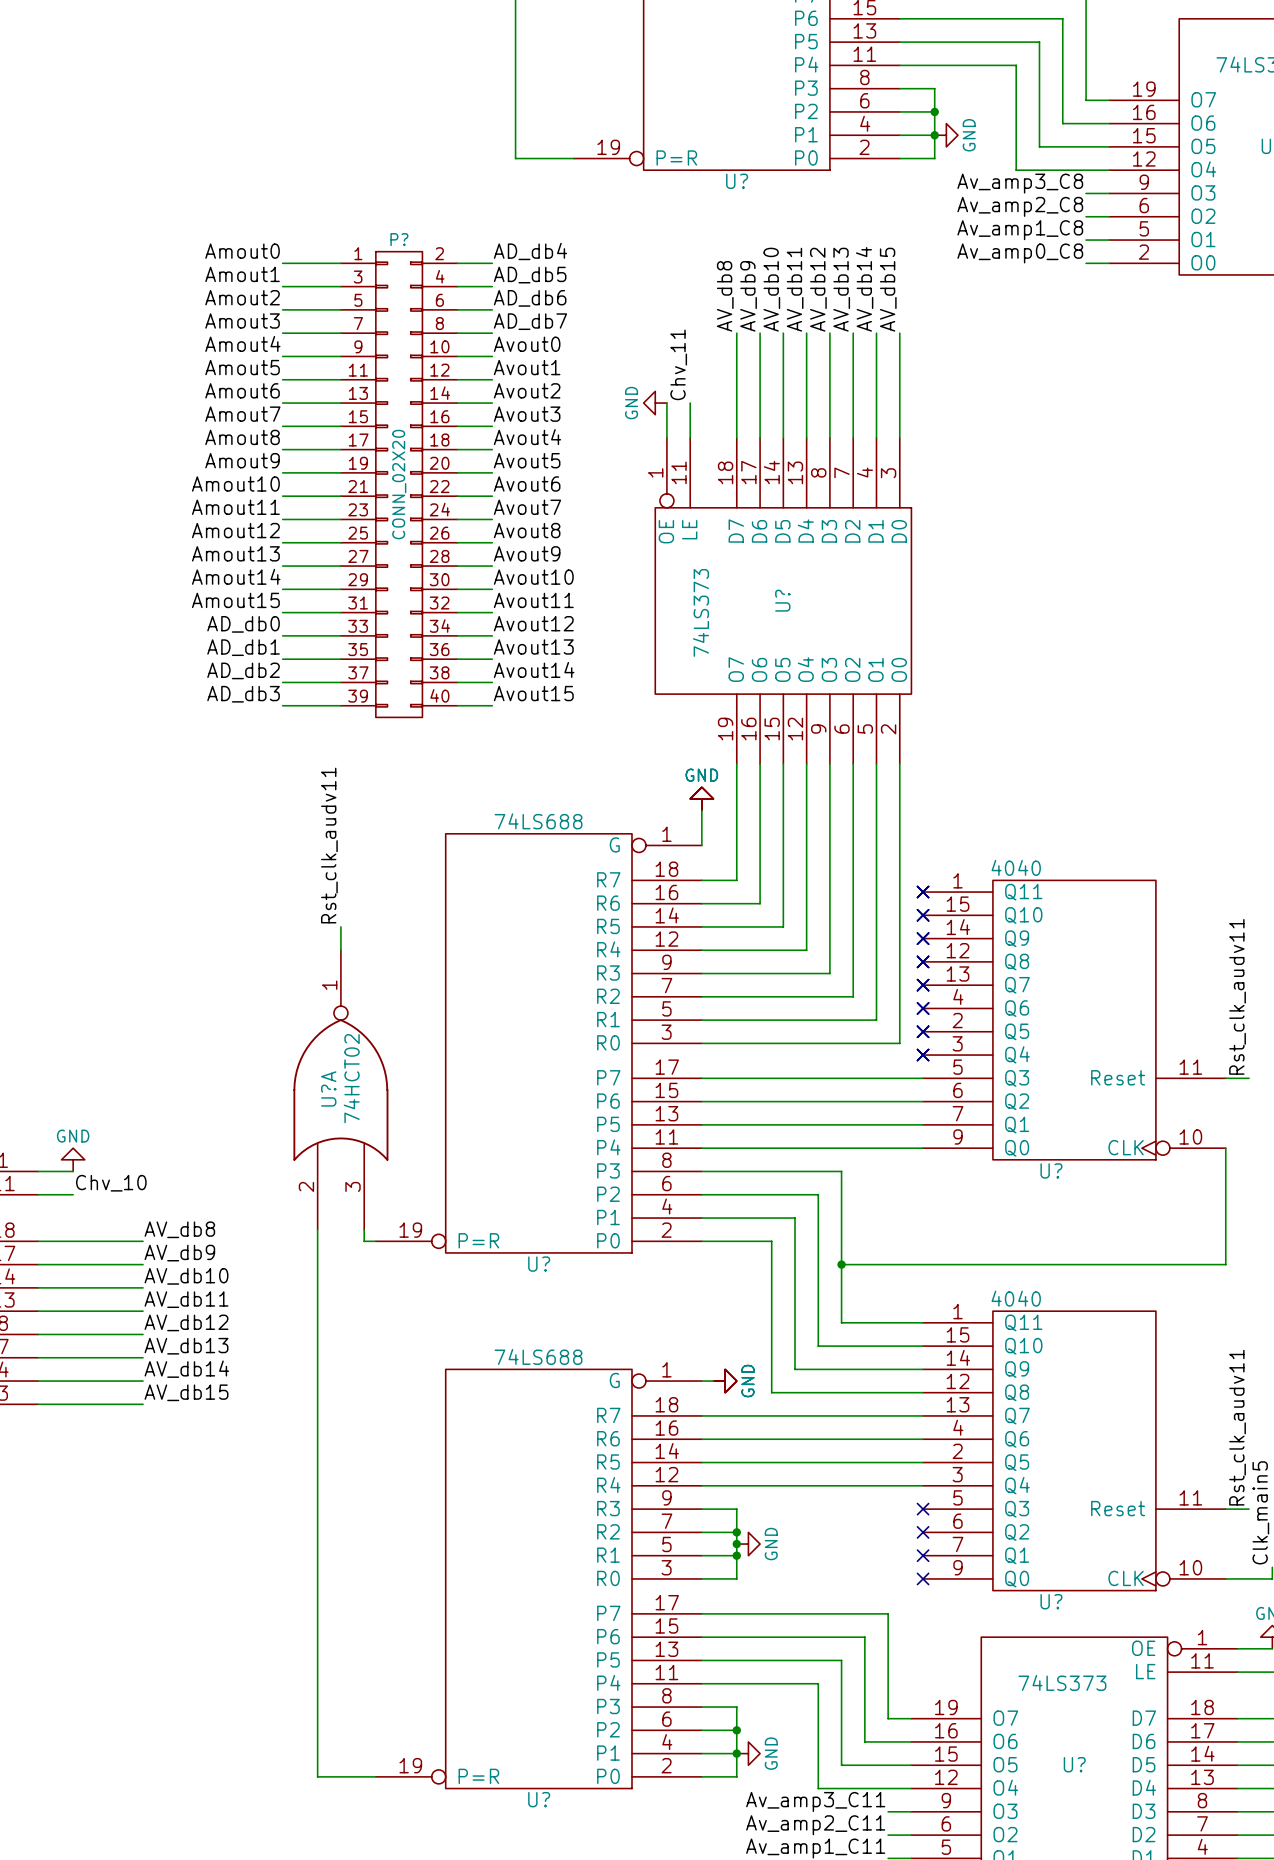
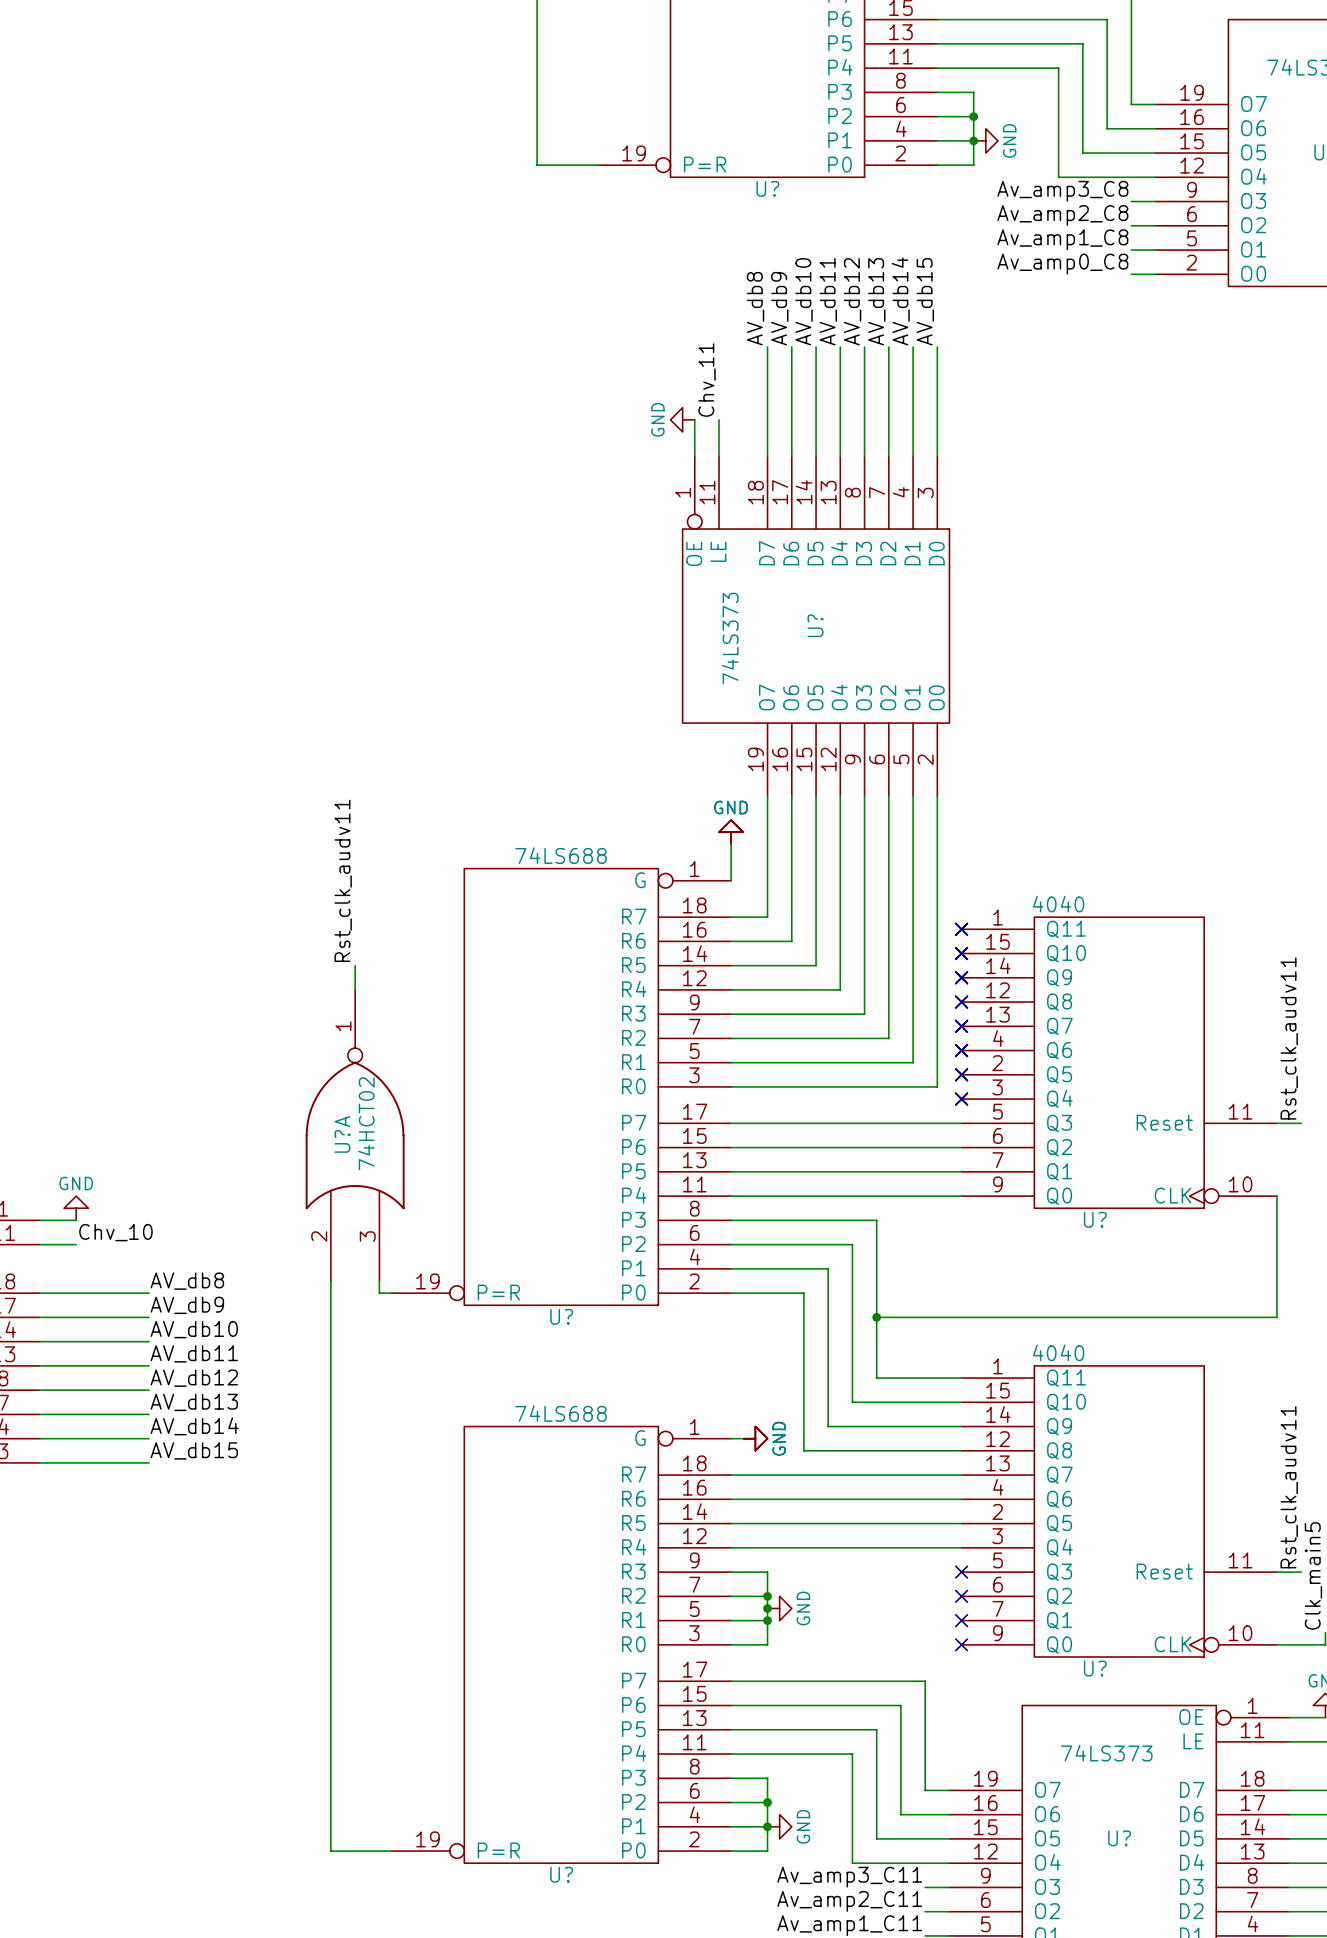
label: Amout0 (242, 251) -> none
label: AD_db4 (530, 251) -> none
wire: (282, 263) (340, 263) -> none
wire: (457, 263) (492, 263) -> none
label: Amout1 (242, 274) -> none
label: AD_db5 (530, 275) -> none
wire: (282, 286) (340, 286) -> none
wire: (457, 286) (492, 286) -> none
label: Amout2 (242, 297) -> none
label: AD_db6 (530, 298) -> none
wire: (282, 309) (340, 309) -> none
wire: (457, 309) (492, 309) -> none
label: Amout3 (242, 320) -> none
label: AD_db7 (530, 321) -> none
wire: (282, 333) (340, 333) -> none
wire: (457, 333) (492, 333) -> none
label: Amout4 (242, 343) -> none
label: Avout0 (527, 344) -> none
wire: (282, 356) (340, 356) -> none
wire: (457, 356) (492, 356) -> none
label: Amout5 (242, 367) -> none
label: Avout1 (527, 367) -> none
wire: (282, 379) (340, 379) -> none
wire: (457, 379) (492, 379) -> none
label: Amout6 (242, 390) -> none
label: Avout2 (527, 390) -> none
wire: (282, 403) (340, 403) -> none
wire: (457, 403) (492, 403) -> none
label: Amout7 (242, 414) -> none
label: Avout3 (527, 414) -> none
wire: (282, 426) (340, 426) -> none
wire: (457, 426) (492, 426) -> none
label: Amout8 (242, 437) -> none
label: Avout4 (527, 437) -> none
wire: (282, 449) (340, 449) -> none
wire: (457, 449) (492, 449) -> none
label: Amout9 (242, 460) -> none
label: Avout5 (527, 460) -> none
wire: (282, 472) (340, 472) -> none
wire: (457, 472) (492, 472) -> none
label: Amout10 (235, 483) -> none
label: Avout6 (527, 483) -> none
P?: CONN_02X20 (399, 484) -> none
wire: (282, 496) (340, 496) -> none
wire: (457, 496) (492, 496) -> none
label: Amout11 (235, 507) -> none
label: Avout7 (527, 507) -> none
wire: (282, 519) (340, 519) -> none
wire: (457, 519) (492, 519) -> none
label: Amout12 (235, 530) -> none
label: Avout8 (527, 530) -> none
wire: (282, 542) (340, 542) -> none
wire: (457, 542) (492, 542) -> none
label: Amout13 (235, 553) -> none
label: Avout9 (527, 553) -> none
wire: (282, 566) (340, 566) -> none
wire: (457, 566) (492, 566) -> none
label: Amout14 (236, 576) -> none
label: Avout10 (533, 577) -> none
wire: (282, 589) (340, 589) -> none
wire: (457, 589) (492, 589) -> none
label: Amout15 (235, 600) -> none
label: Avout11 (533, 600) -> none
wire: (282, 612) (340, 612) -> none
wire: (457, 612) (492, 612) -> none
label: Avout12 (533, 623) -> none
label: AD_db0 (243, 624) -> none
wire: (282, 635) (340, 635) -> none
wire: (457, 635) (492, 635) -> none
label: Avout13 (533, 646) -> none
label: AD_db1 (243, 647) -> none
wire: (282, 659) (340, 659) -> none
wire: (457, 659) (492, 659) -> none
label: Avout14 (534, 669) -> none
label: AD_db2 (243, 670) -> none
wire: (282, 682) (340, 682) -> none
wire: (457, 682) (492, 682) -> none
label: Avout15 (533, 693) -> none
label: AD_db3 (243, 694) -> none
wire: (282, 705) (340, 705) -> none
wire: (457, 705) (492, 705) -> none

